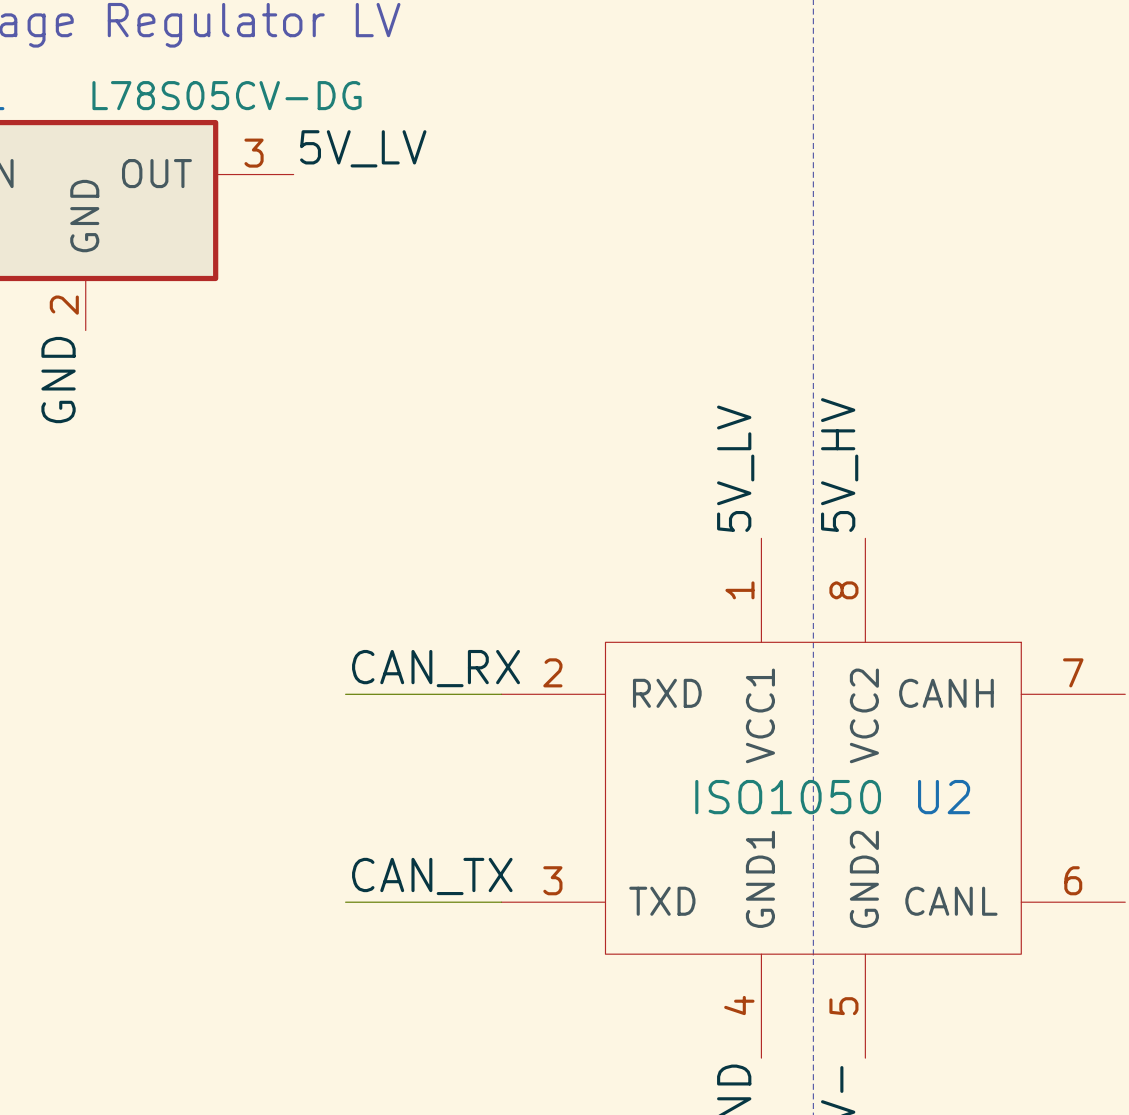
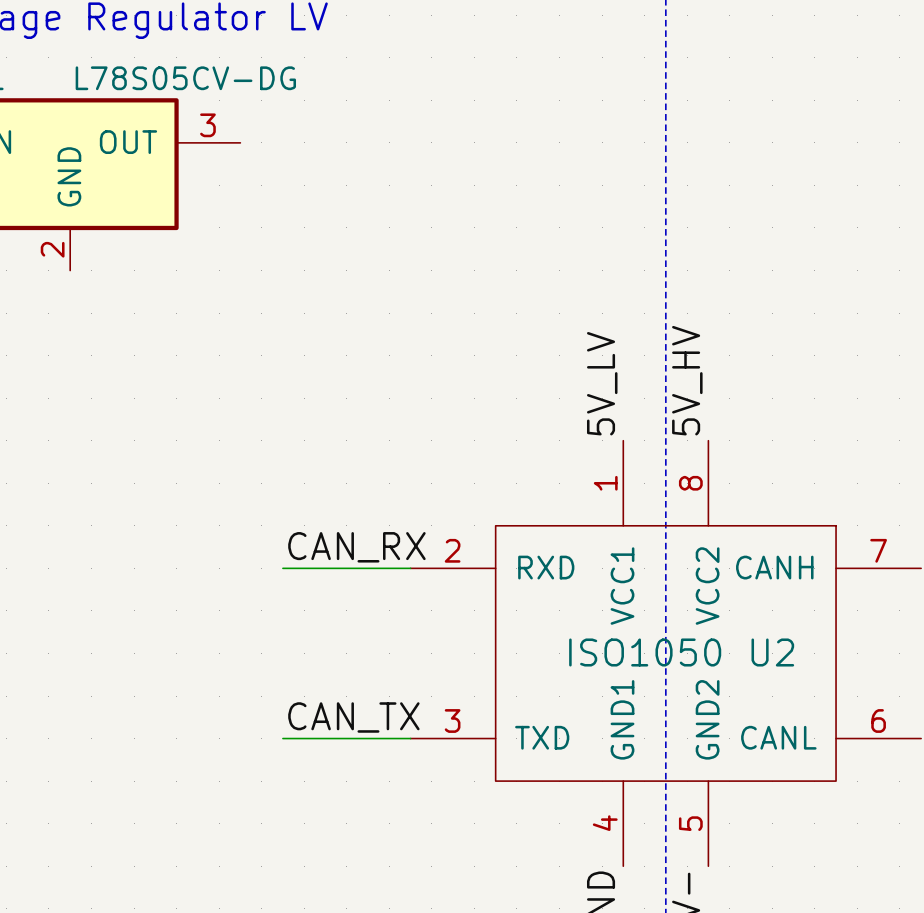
label: 5V_LV (363, 148) -> none
label: GND (58, 380) -> none

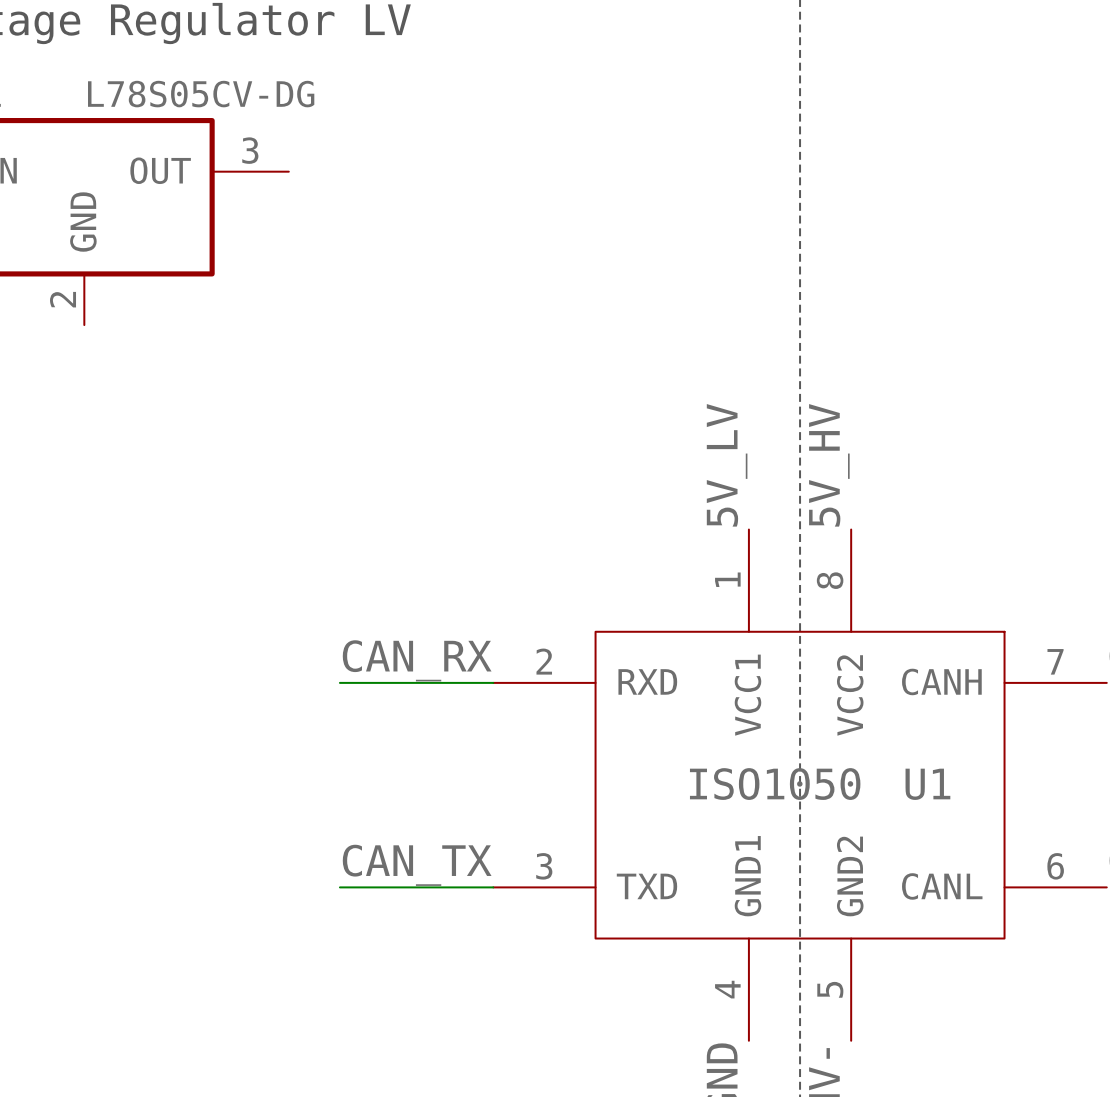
U2 name: U2 (772, 652) -> U1 (927, 784)

